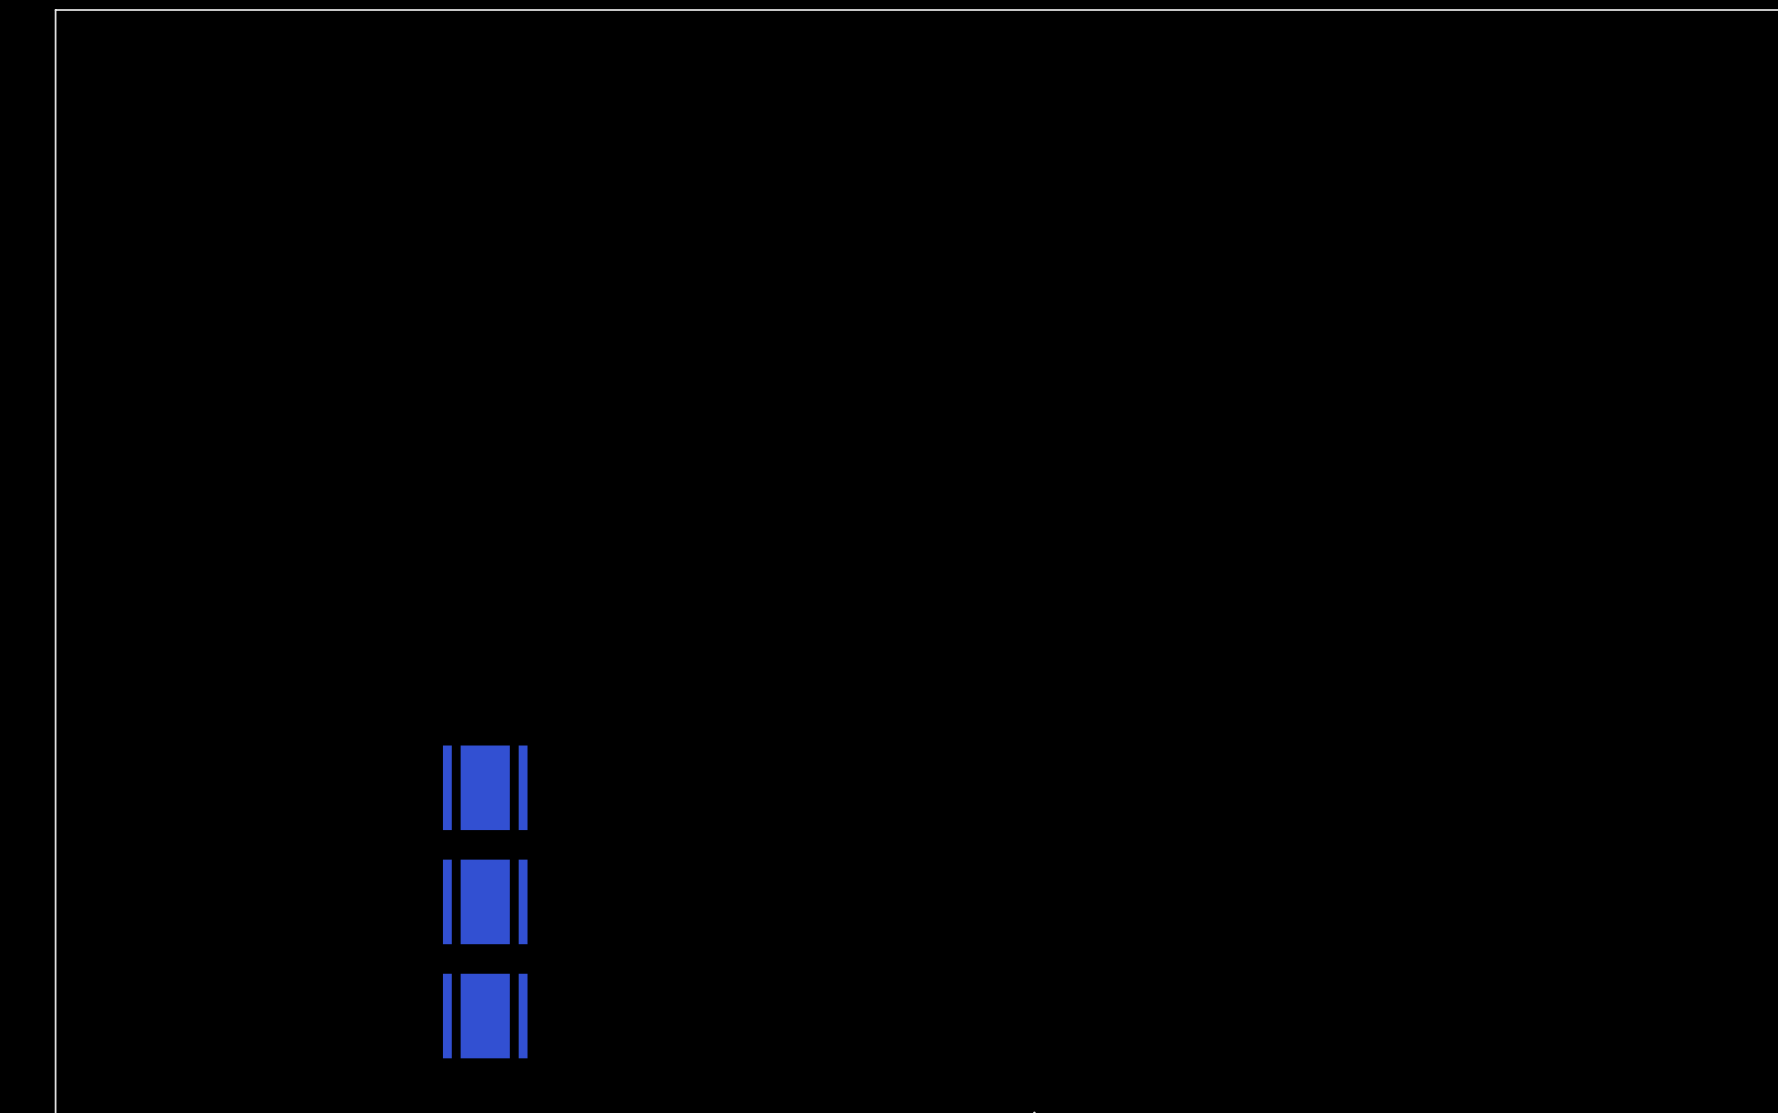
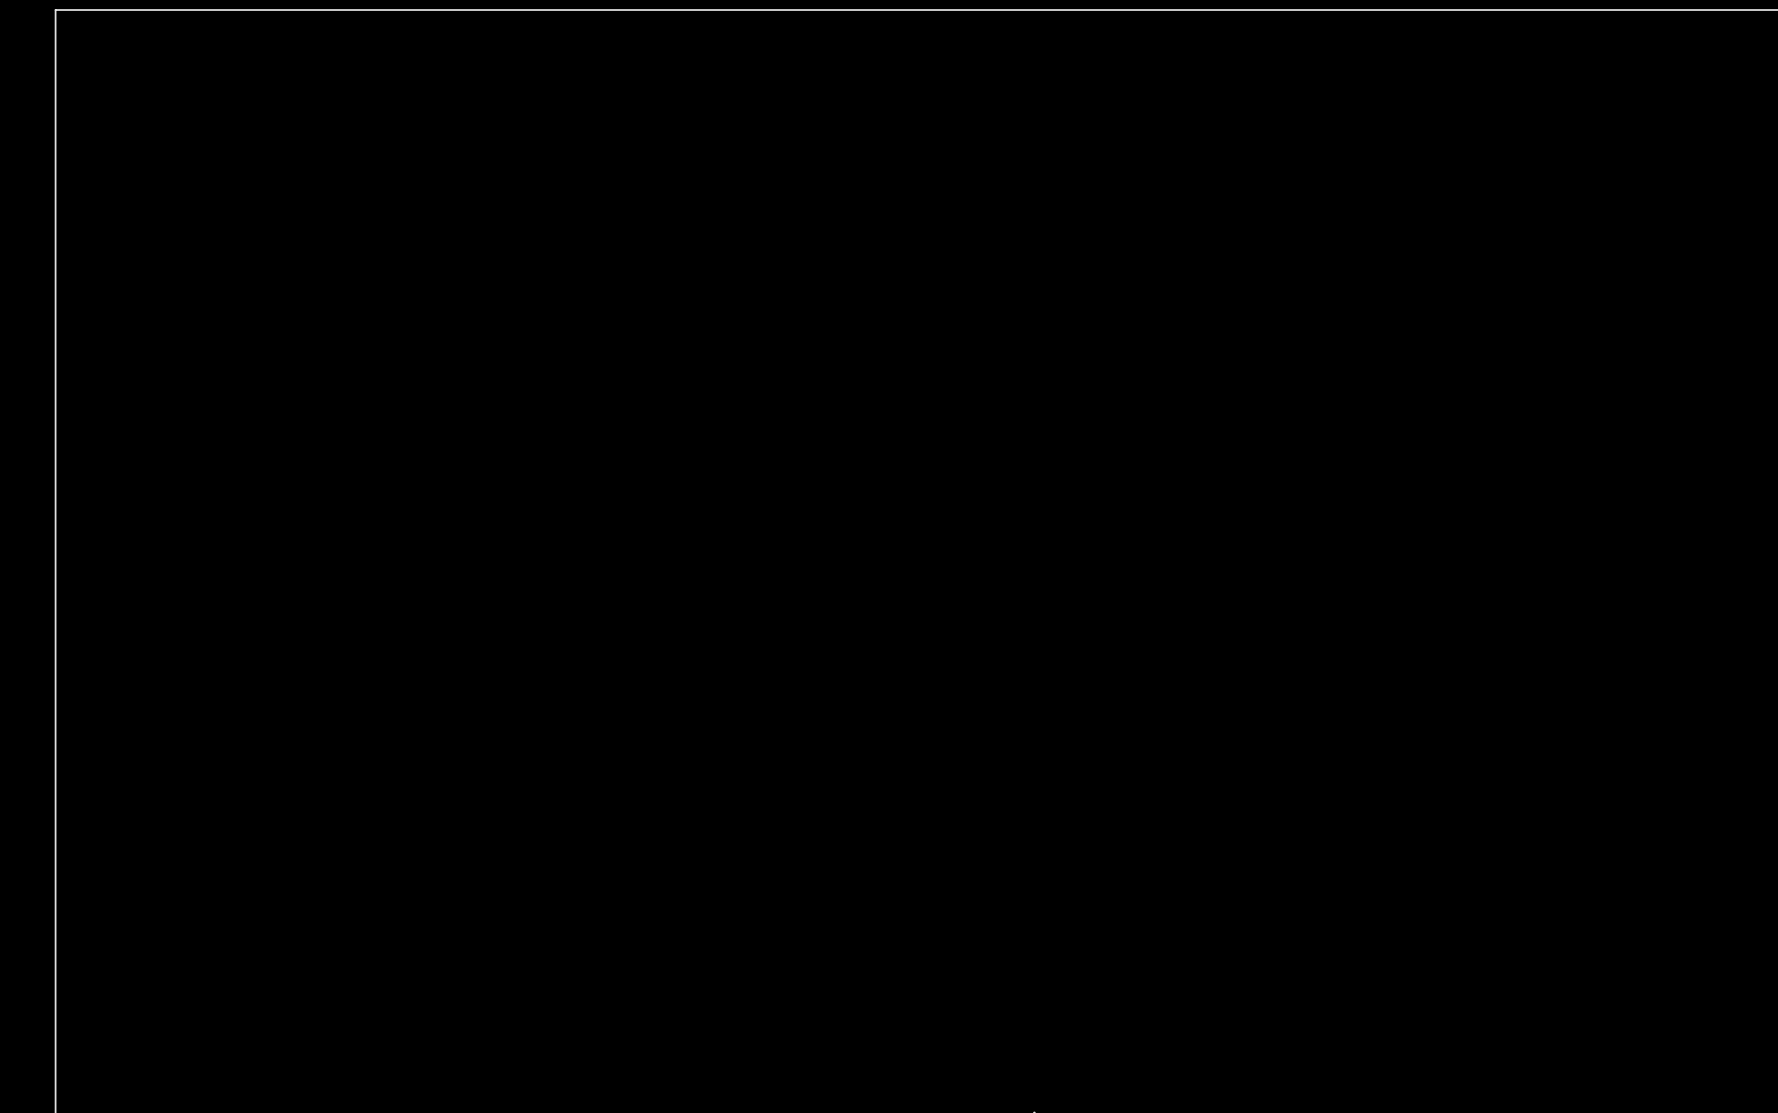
part: (485, 787) -> none
part: (485, 901) -> none
part: (485, 1016) -> none

